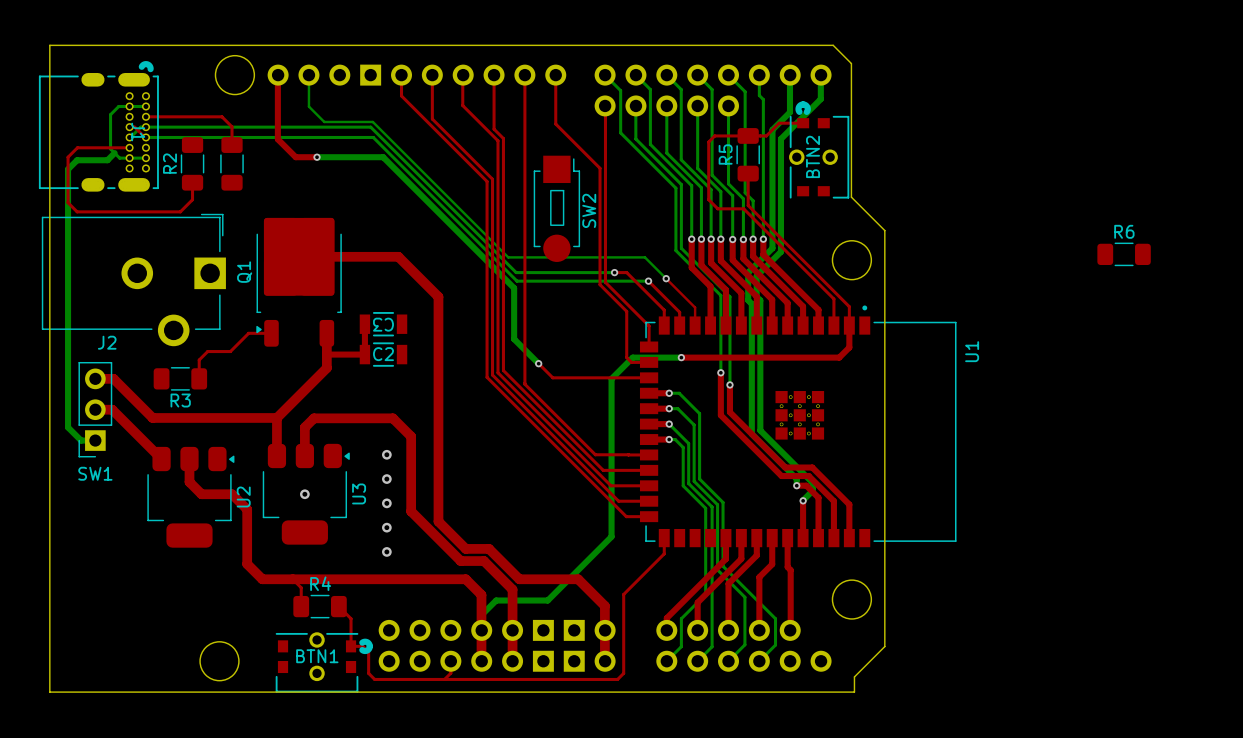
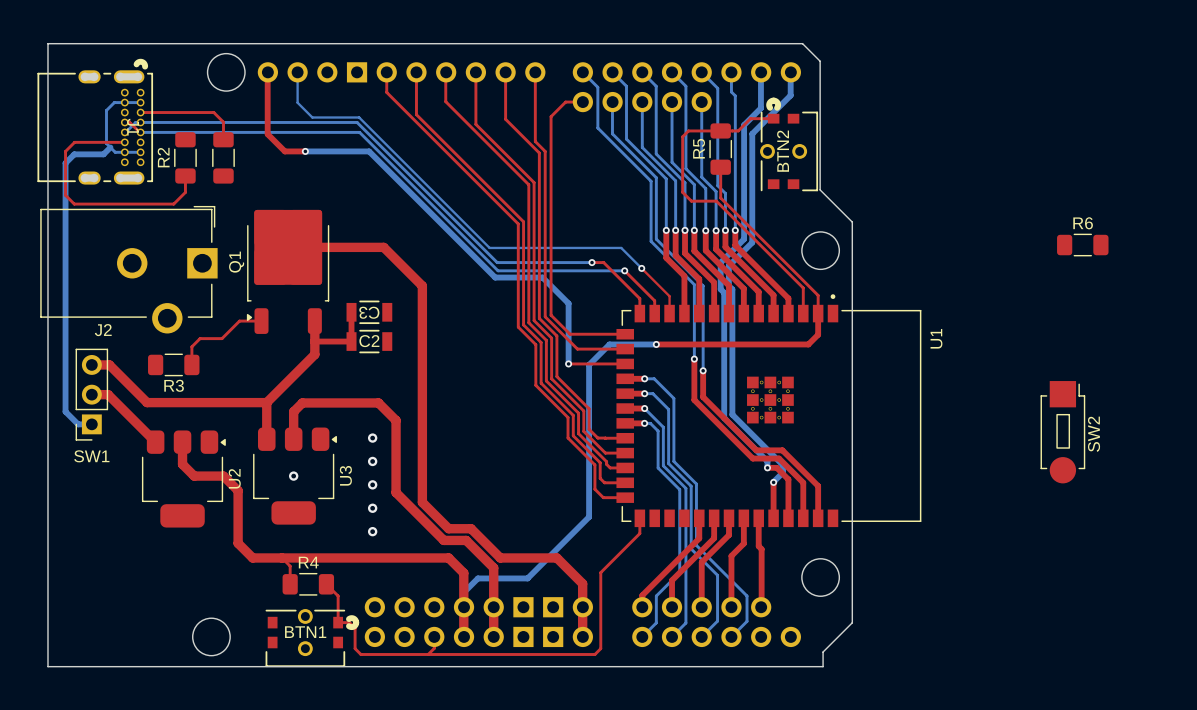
top track: (605, 105) (605, 282) (649, 326) (649, 346) -> (582, 102) (565, 102) (551, 116) (551, 315) (570, 334) (625, 334)
top track: (524, 123) (524, 383) (595, 454) (620, 454) -> (505, 119) (539, 153) (539, 318) (556, 335) (556, 376) (589, 408) (589, 429) (597, 438)
top track: (555, 124) (600, 168) (600, 284) (626, 311) (626, 357) (631, 362) -> (535, 119) (535, 141) (545, 151) (545, 316) (577, 349) (608, 349)
top track: (503, 138) (503, 370) (603, 470) (628, 470) -> (484, 133) (534, 182) (534, 320) (551, 338) (551, 378) (583, 410) (583, 431) (605, 453)
top track: (497, 140) (497, 372) (610, 485) (633, 485) -> (479, 135) (528, 184) (528, 322) (546, 340) (546, 381) (578, 413) (578, 433) (606, 461) (610, 467)
top track: (492, 179) (492, 375) (618, 501) (627, 501) -> (474, 172) (523, 221) (523, 324) (541, 342) (541, 383) (573, 415) (573, 435) (600, 462) (600, 478) (604, 482)
top track: (487, 181) (487, 377) (617, 507) -> (469, 174) (518, 223) (518, 327) (535, 344) (535, 385) (568, 417) (568, 438) (594, 464) (594, 489)
SW2 position: (556, 208) -> (1062, 432)
bottom track: (514, 288) (514, 339) (538, 363) -> (495, 277) (542, 277) (568, 303) (568, 363)
top track: (538, 363) (552, 377) (590, 377) -> none
via position: (538, 363) -> (568, 363)

